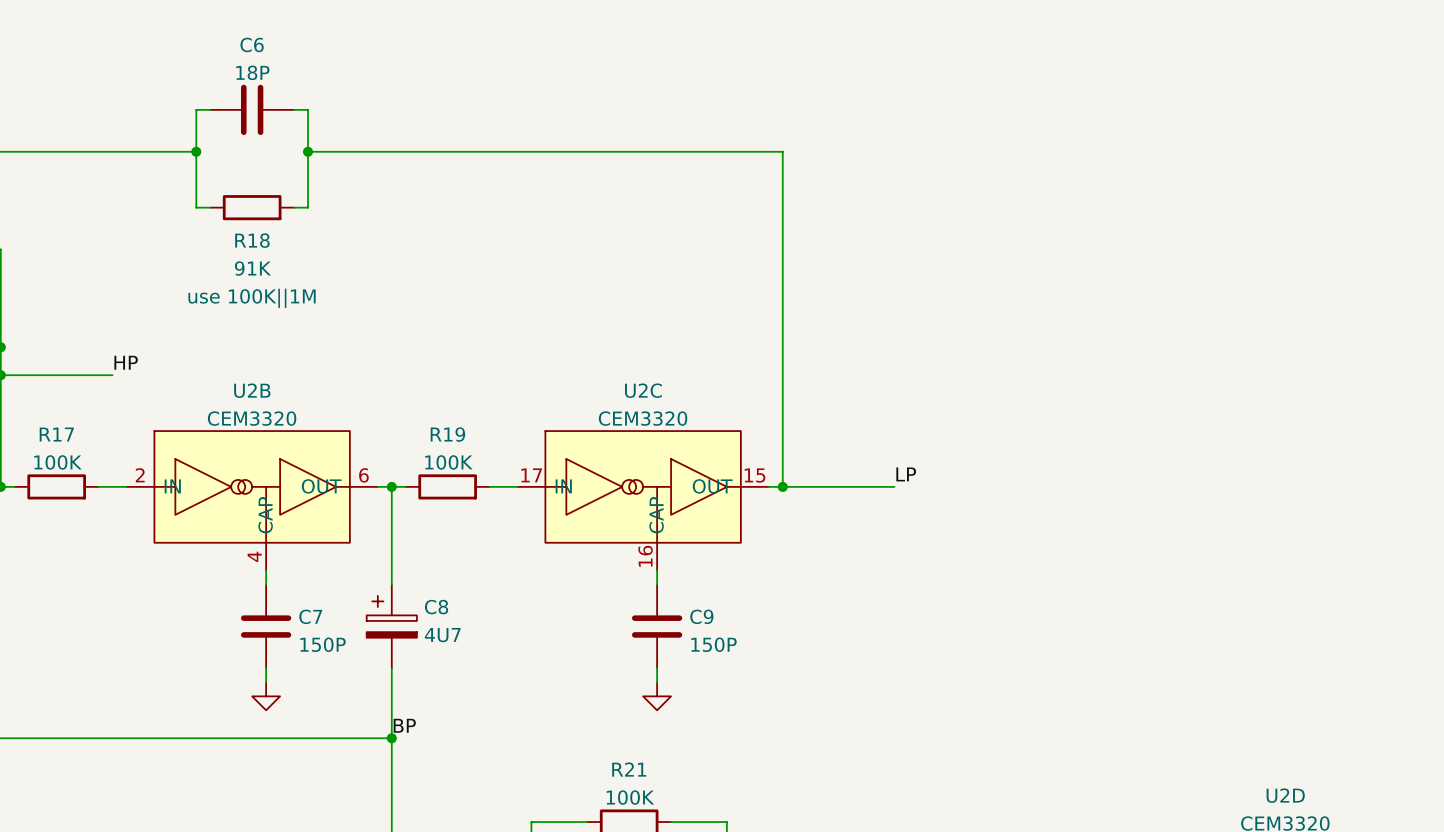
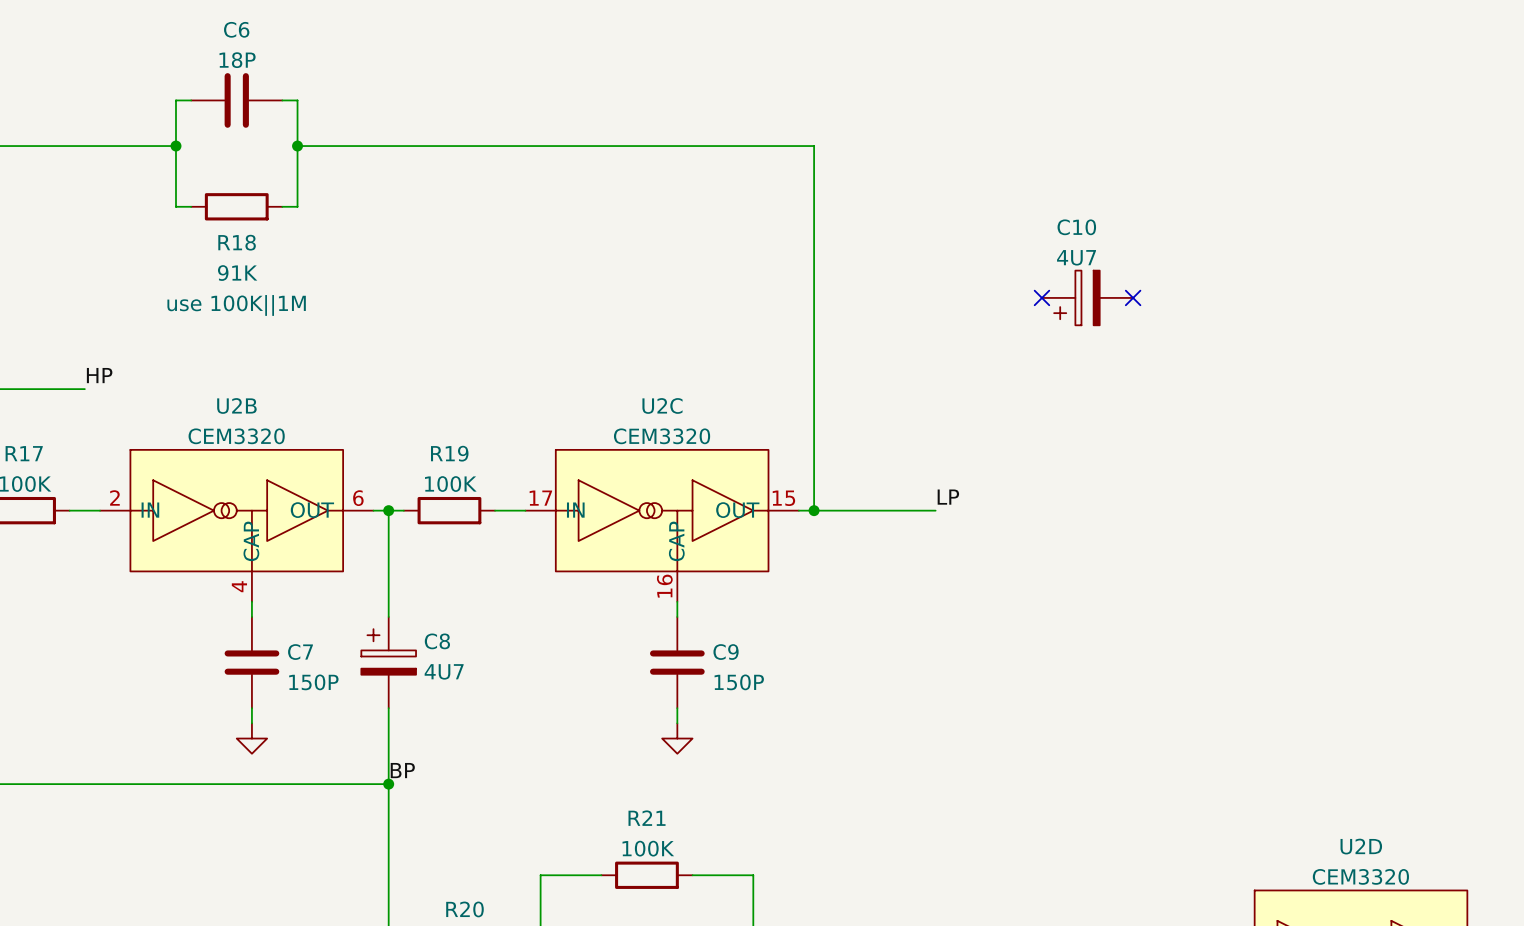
no-connect mark: none -> (1041, 297)
C10: none -> 4U7 (1087, 297)
no-connect mark: none -> (1133, 297)

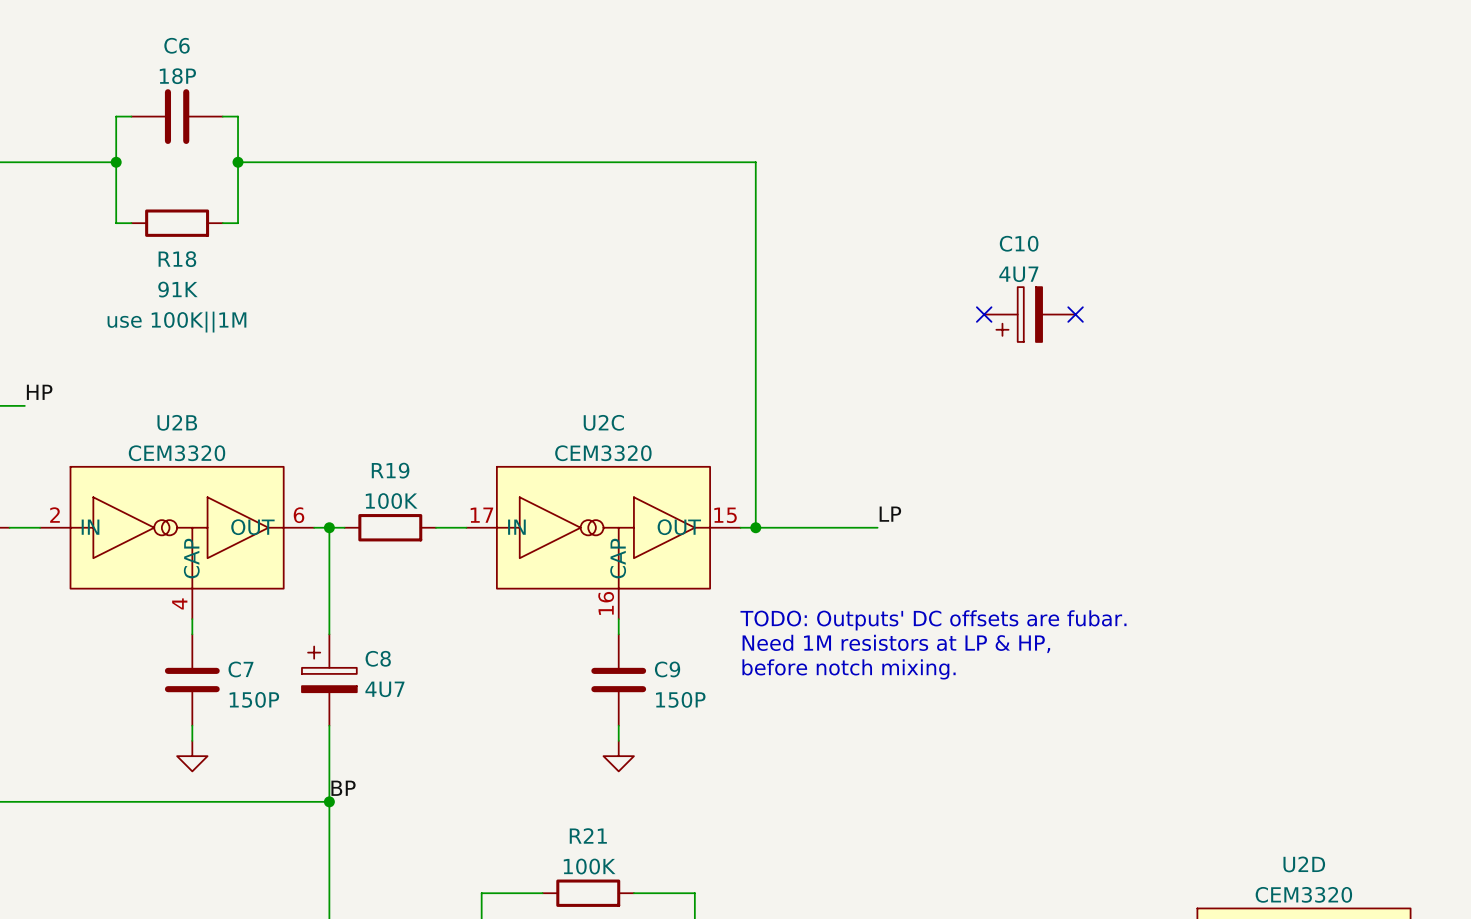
text: none -> TODO: Outputs' DC offsets are fubar. (933, 620)
text: none -> Need 1M resistors at LP & HP, (896, 643)
text: none -> before notch mixing. (849, 669)

